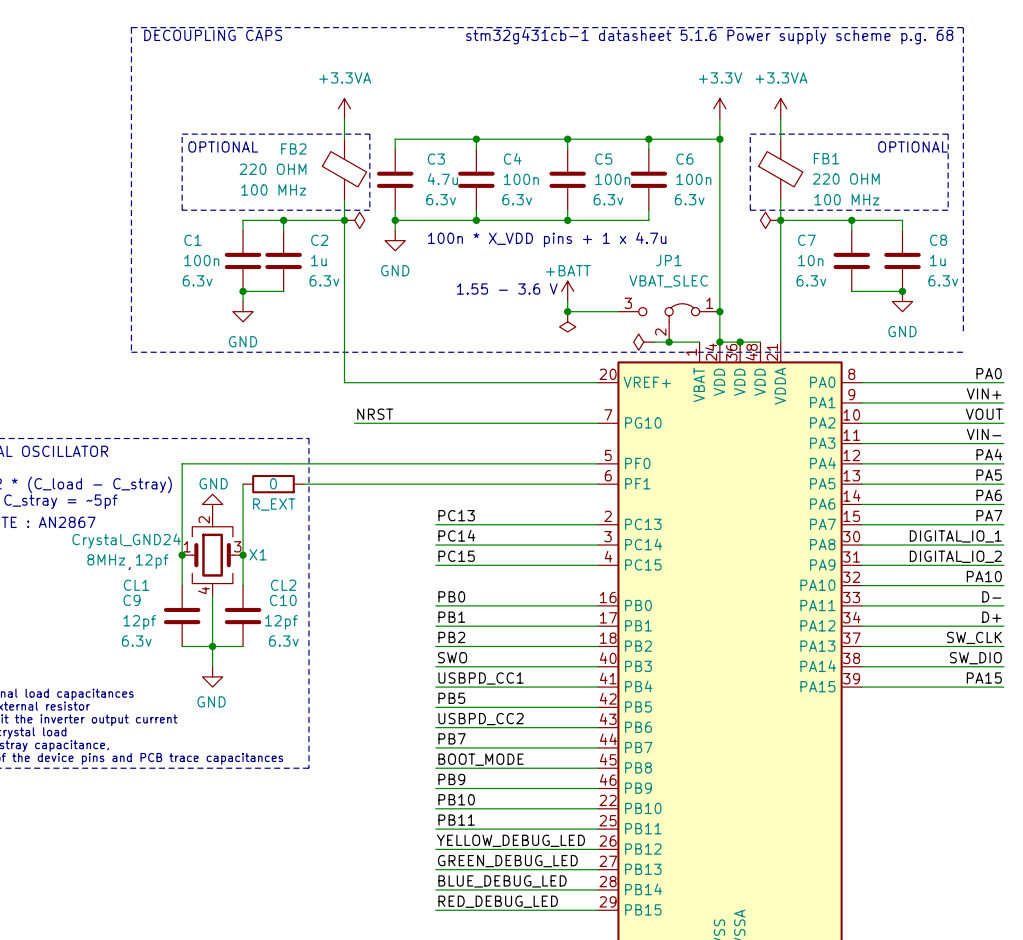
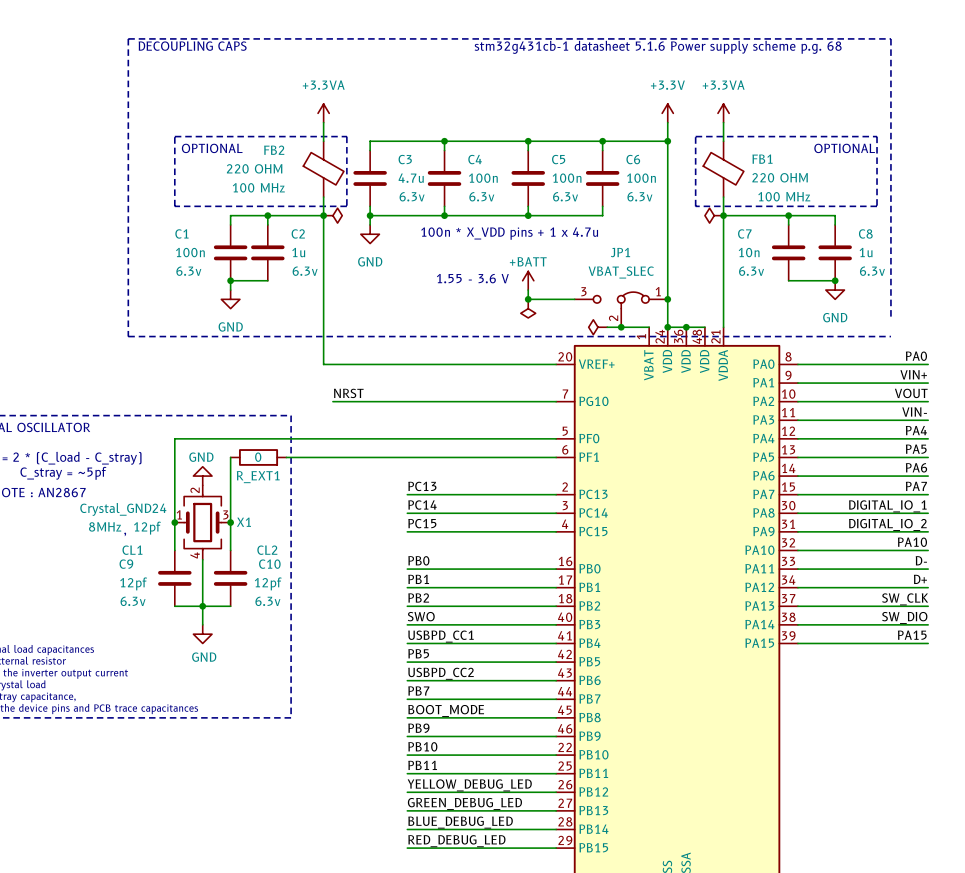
R_EXT name: R_EXT (274, 504) -> R_EXT1 (258, 477)

